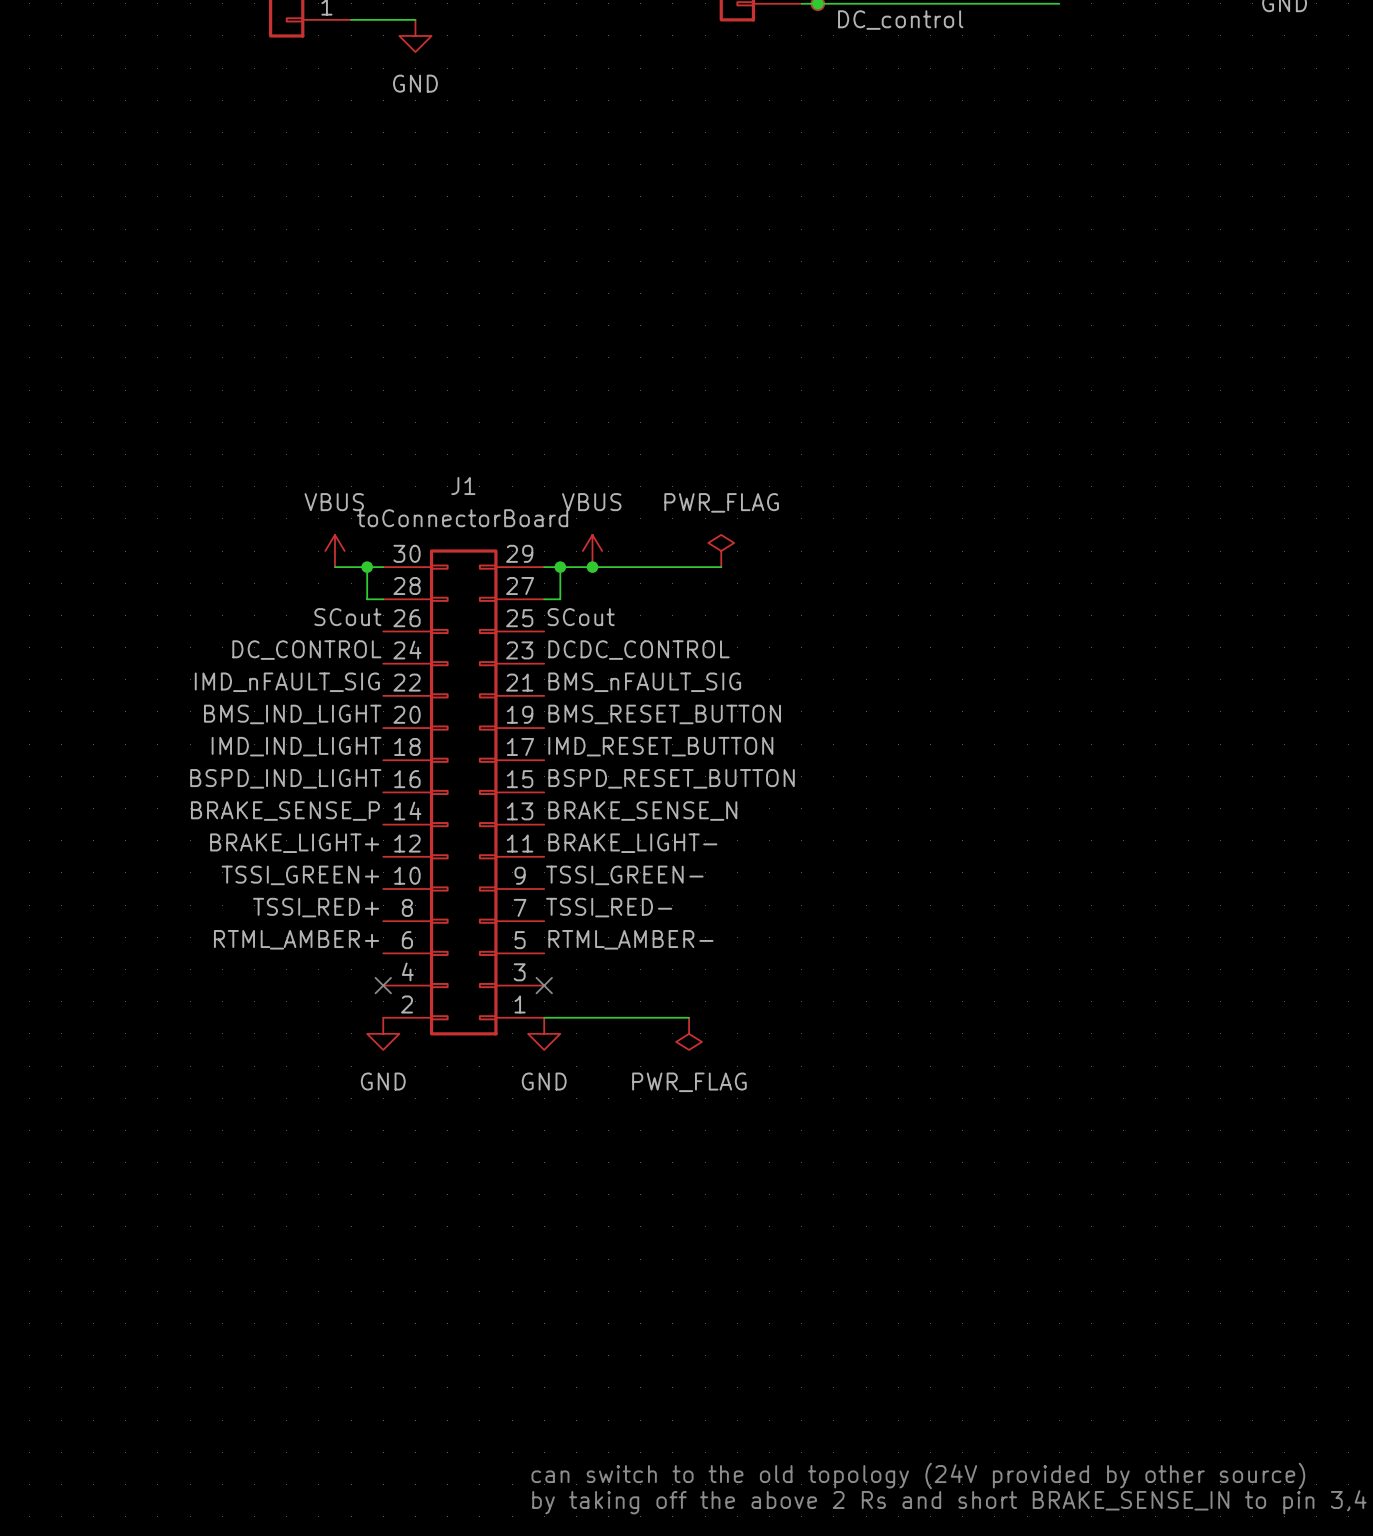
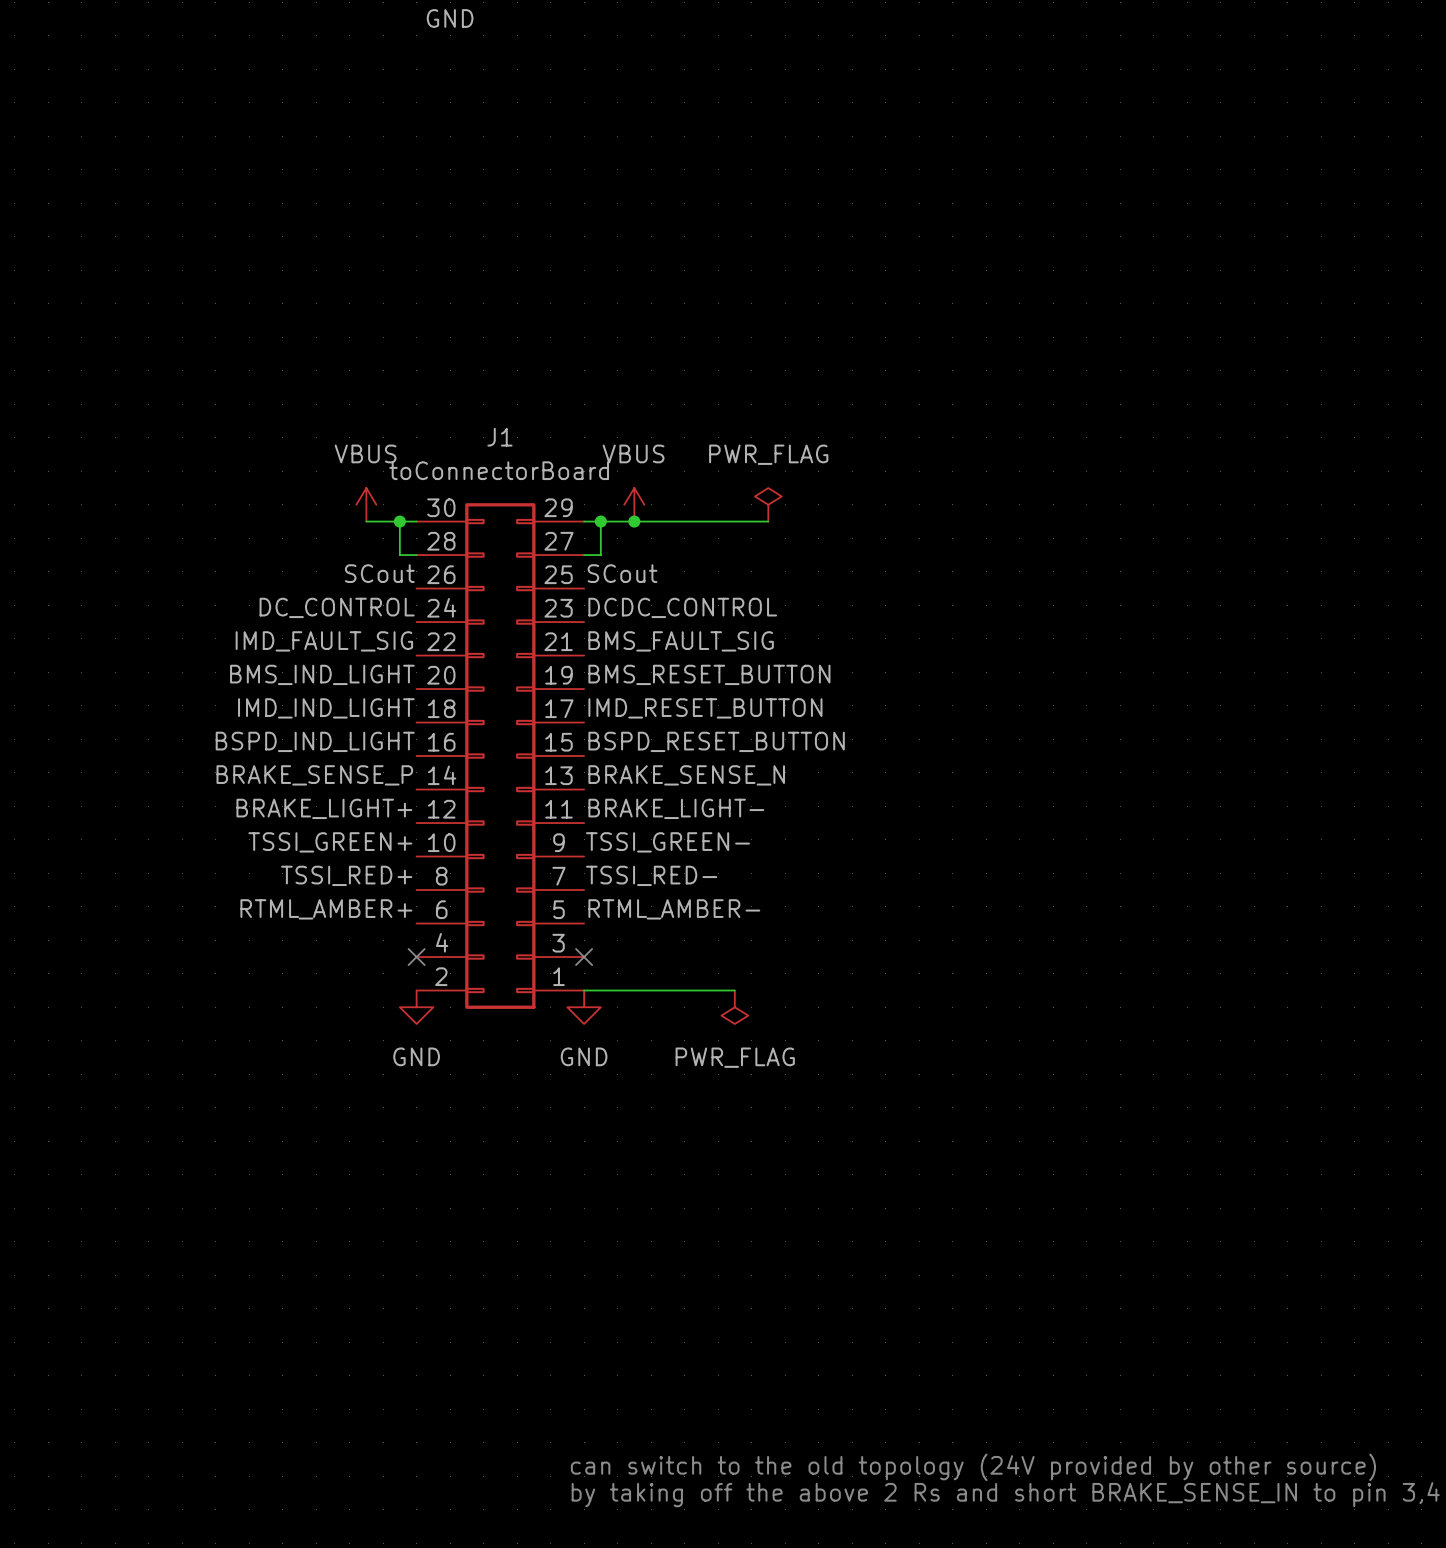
label: IMD_nFAULT_SIG (287, 682) -> IMD_FAULT_SIG (324, 641)
label: BMS_nFAULT_SIG (644, 682) -> BMS_FAULT_SIG (681, 641)

